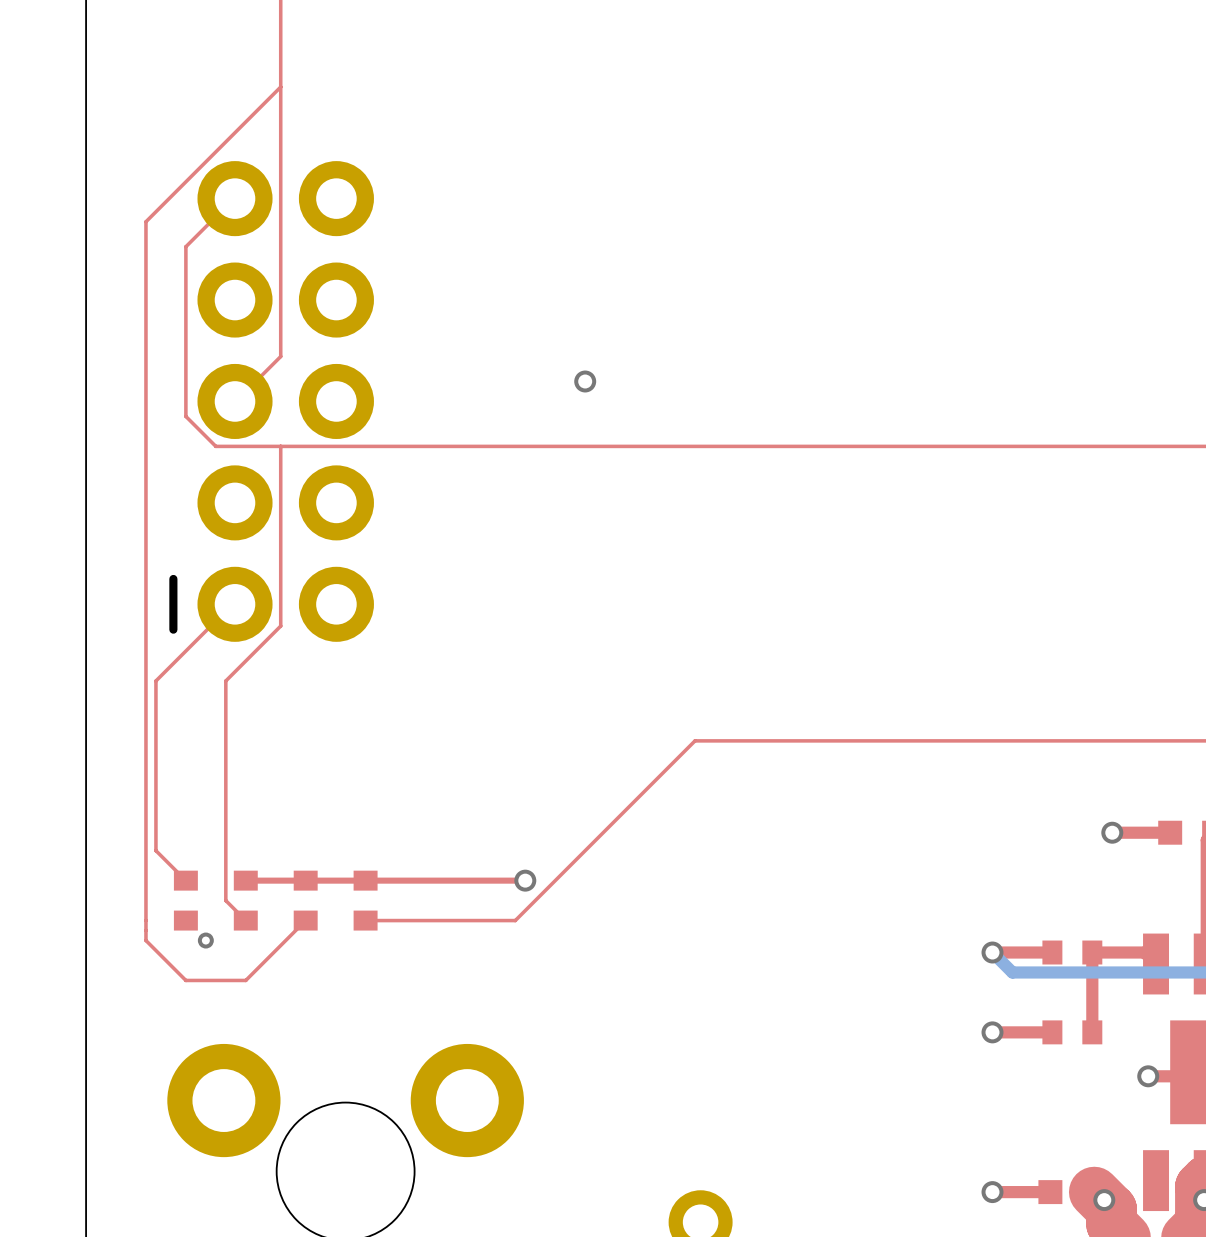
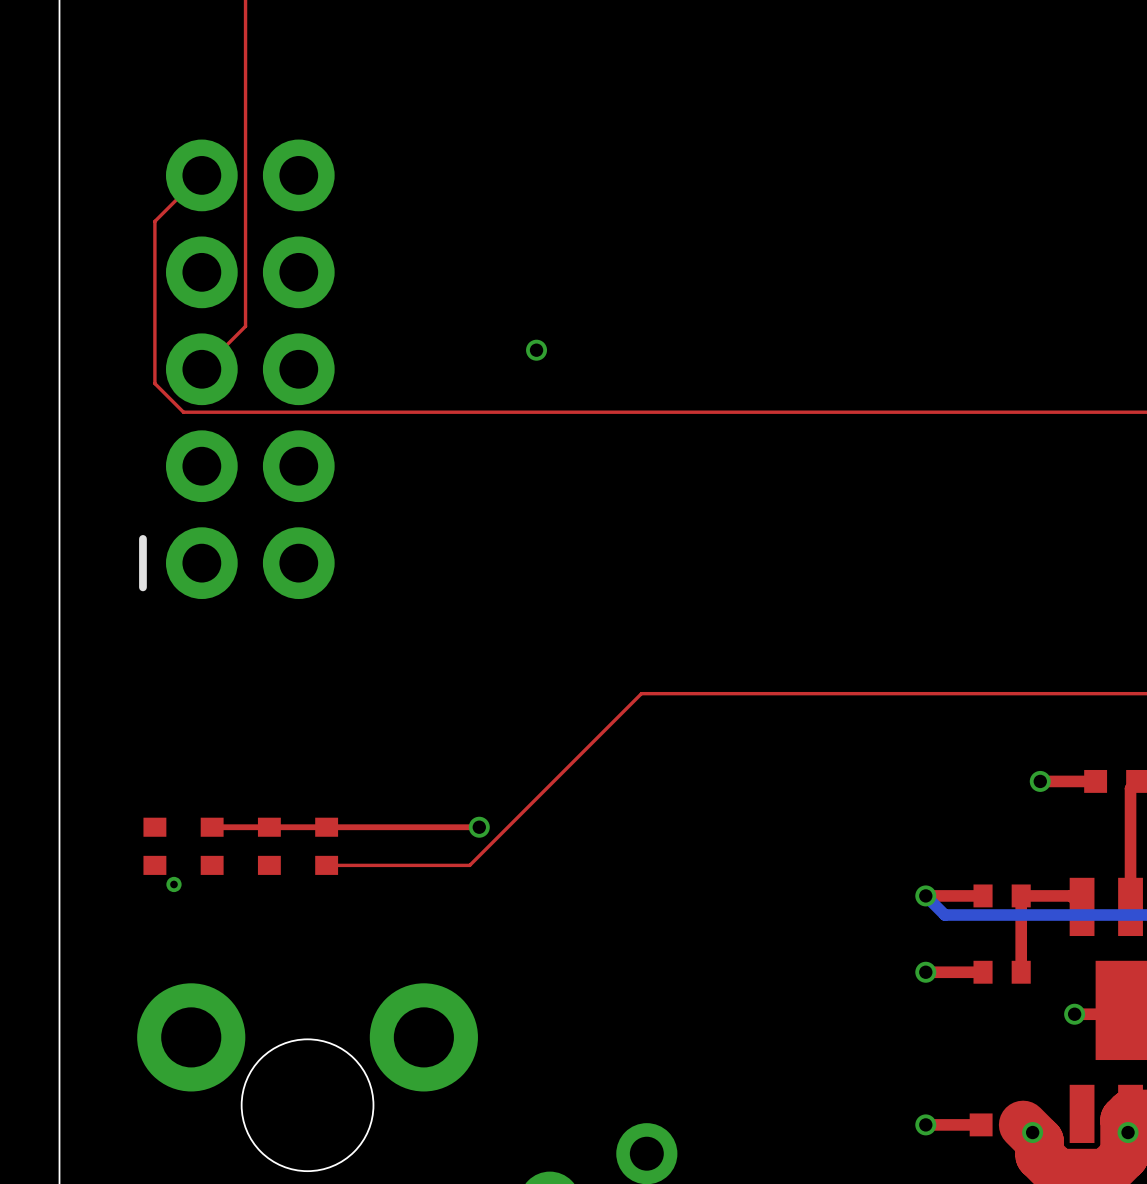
top track: (280, 87) (145, 221) (145, 940) (185, 980) (245, 980) (305, 920) -> none
top track: (280, 446) (280, 626) (225, 680) (225, 900) (245, 920) -> none
top track: (235, 604) (230, 606) (155, 680) (155, 850) (185, 880) -> none

